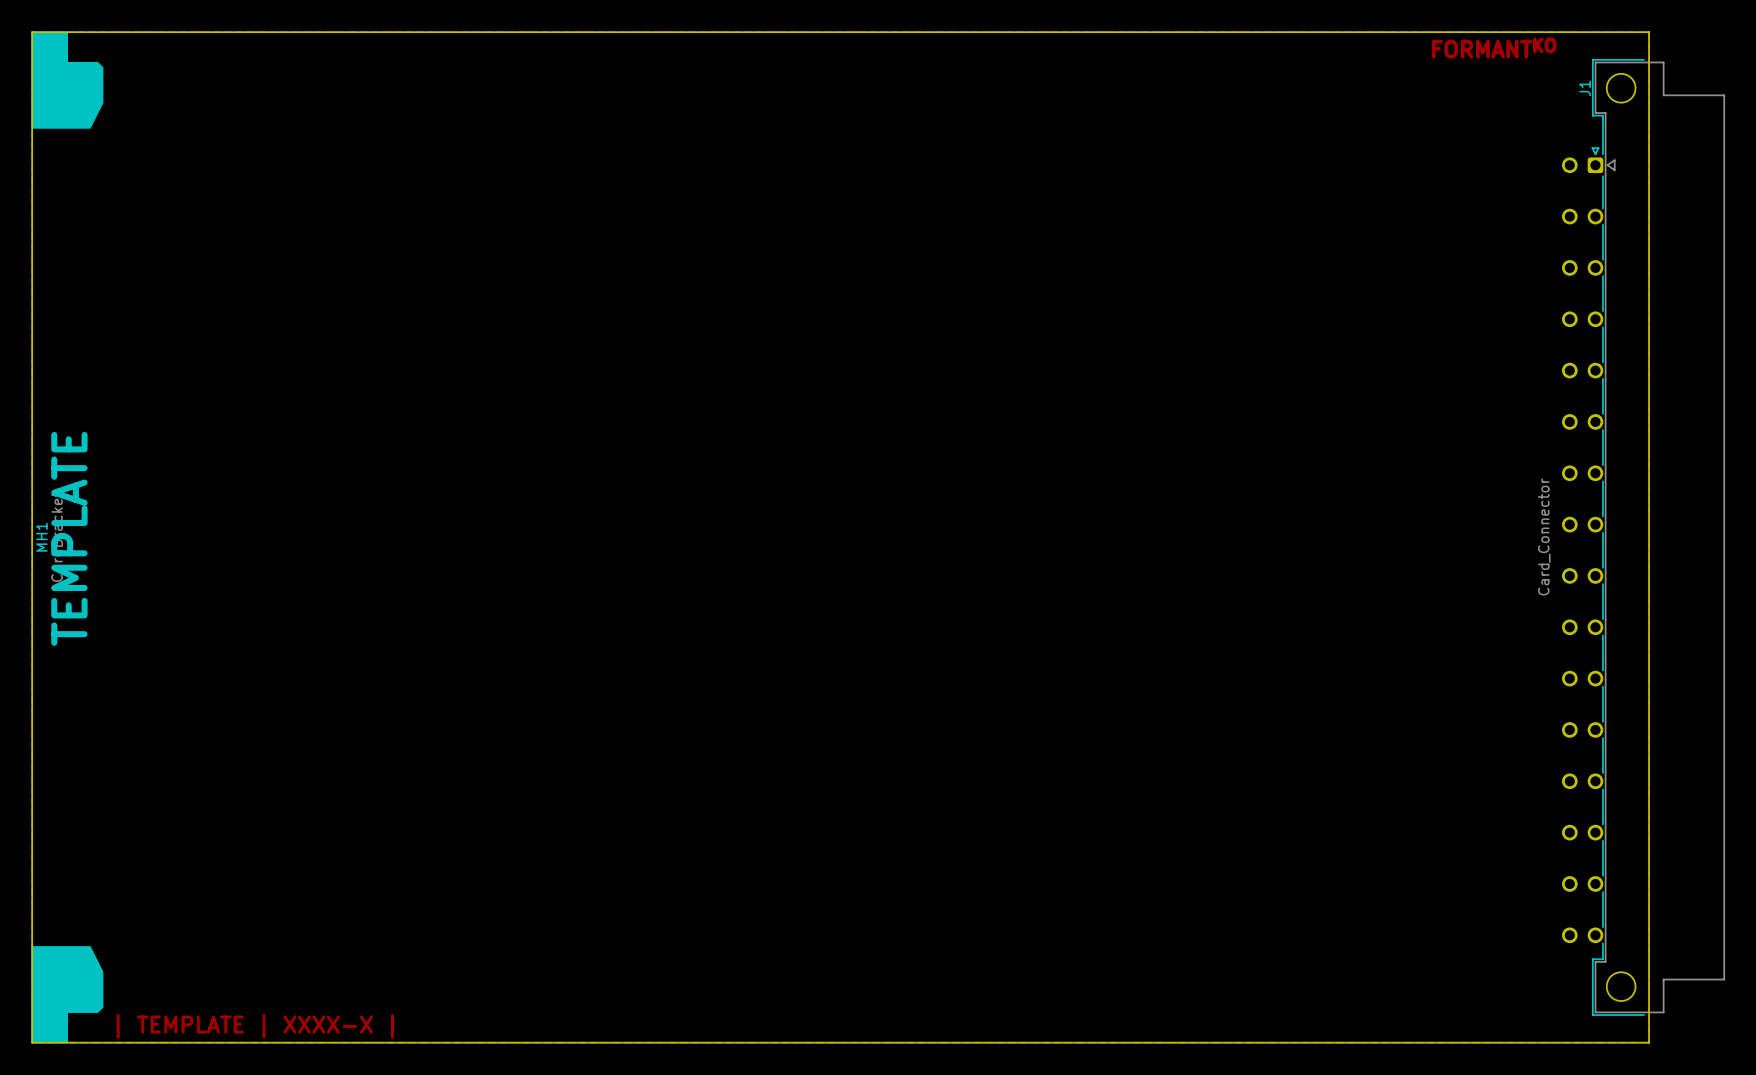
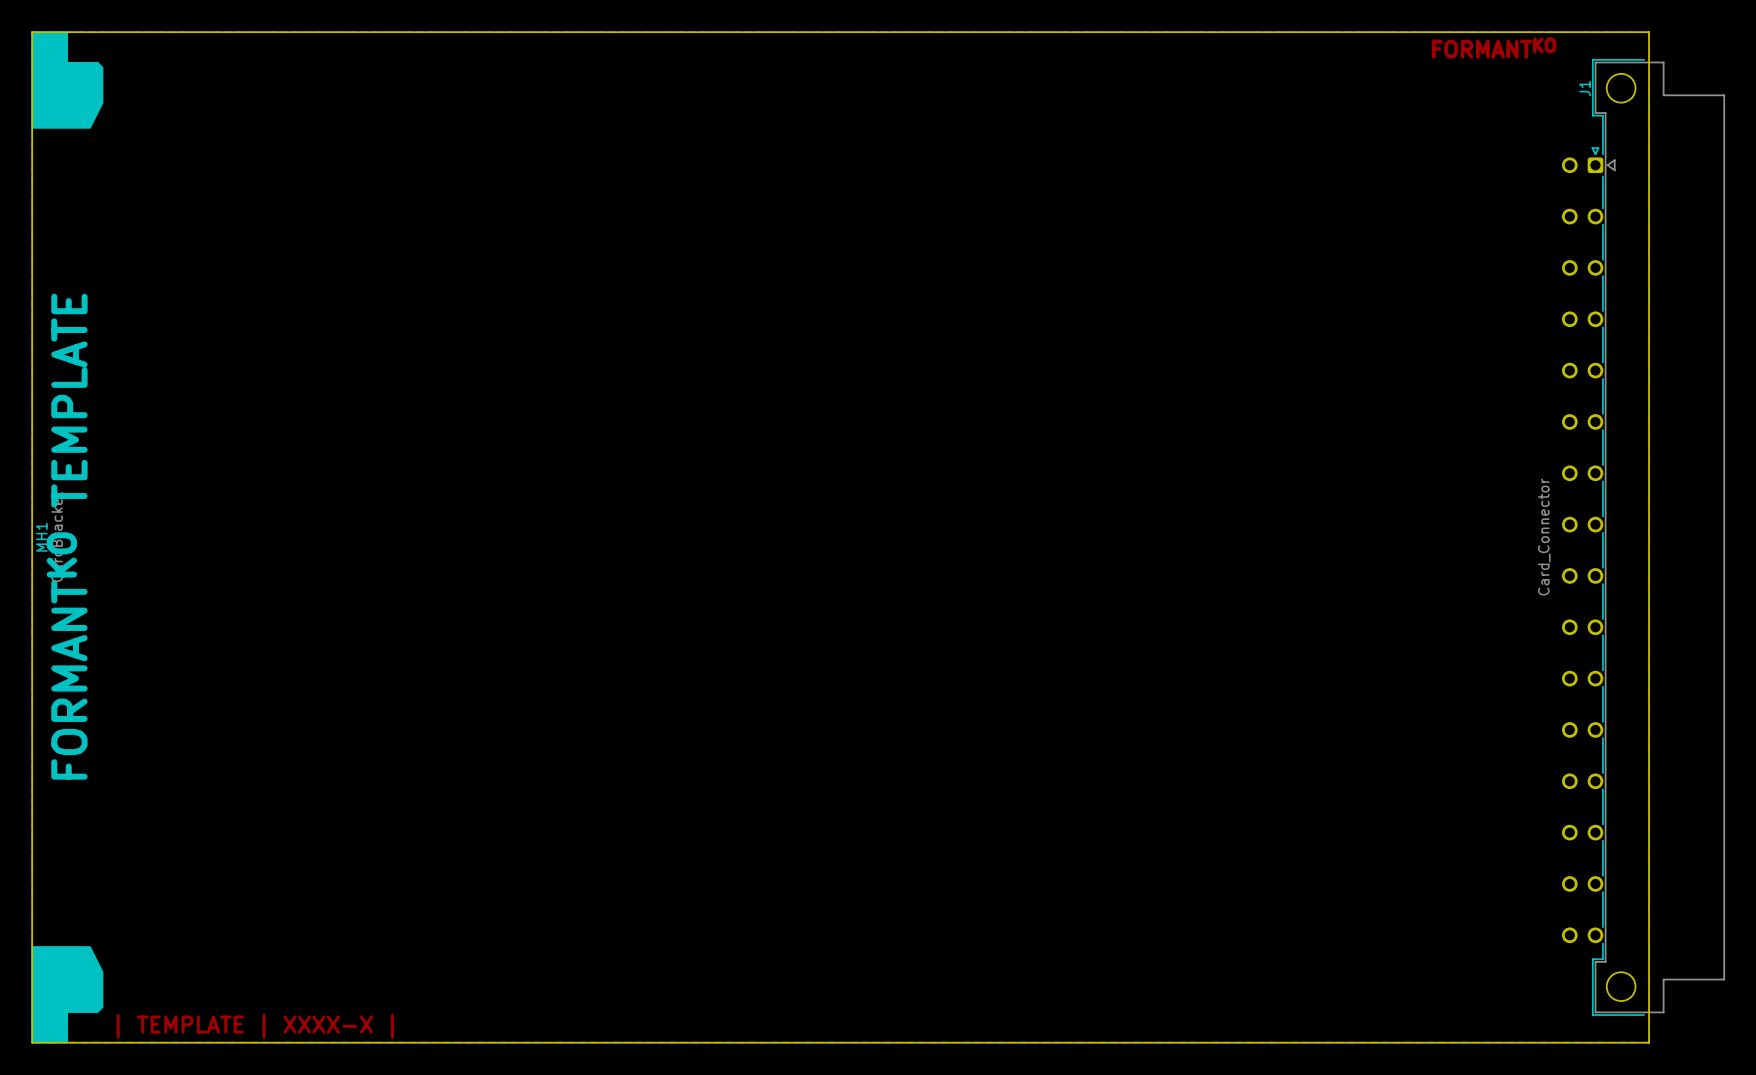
text: TEMPLATE (69, 538) -> FORMANTKO TEMPLATE (67, 536)

